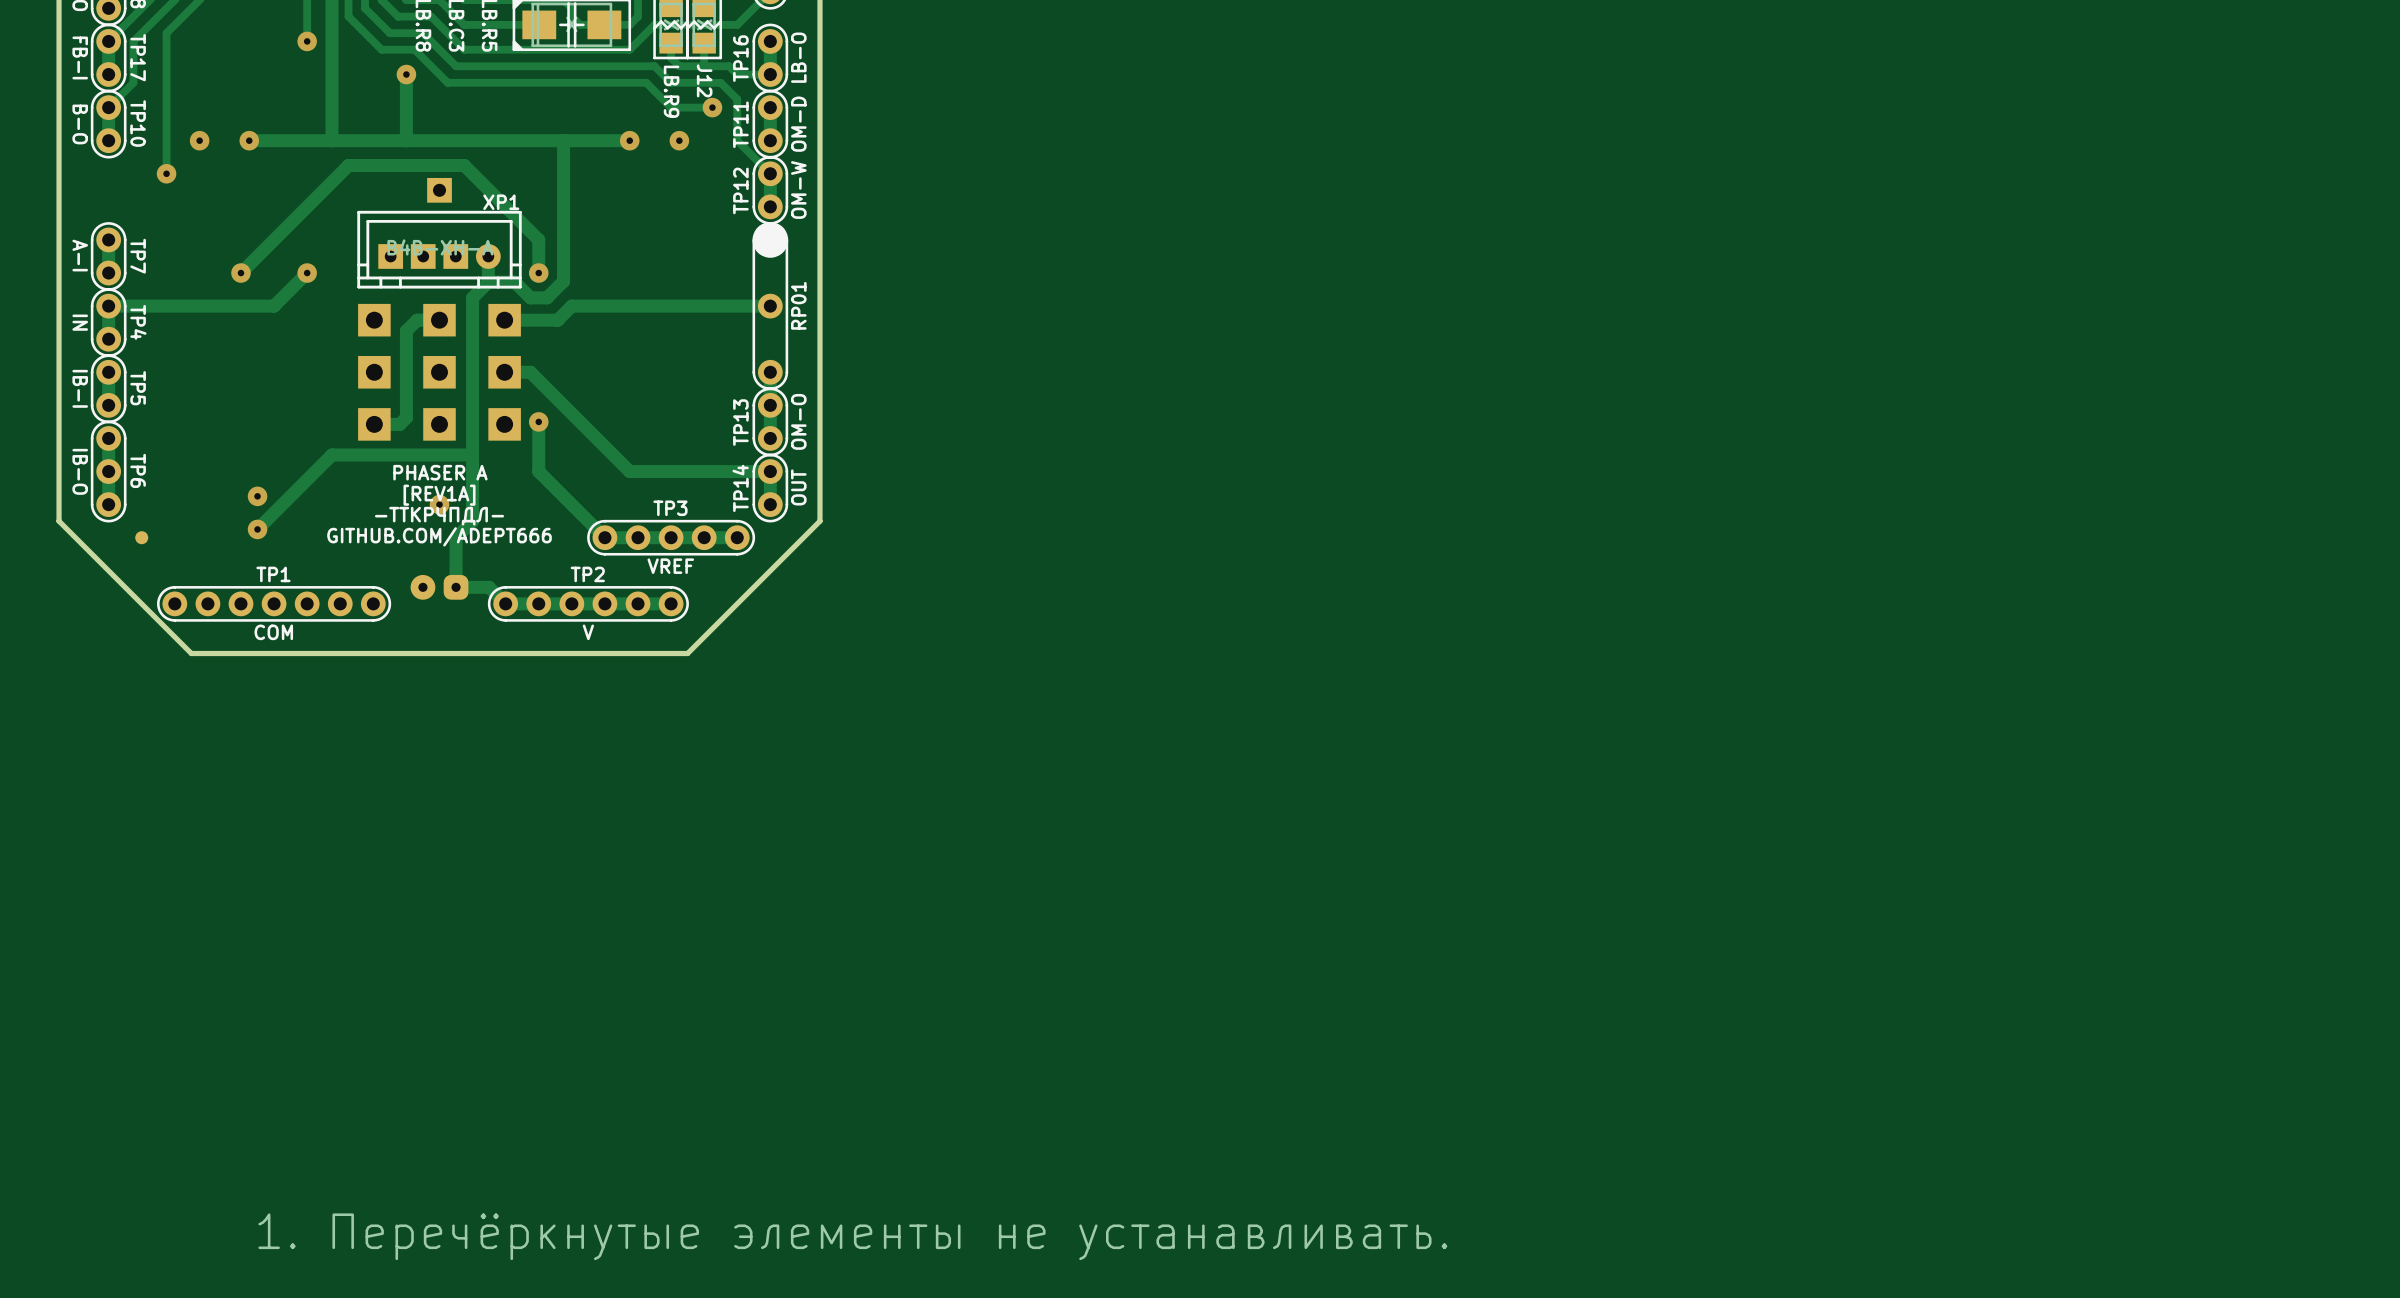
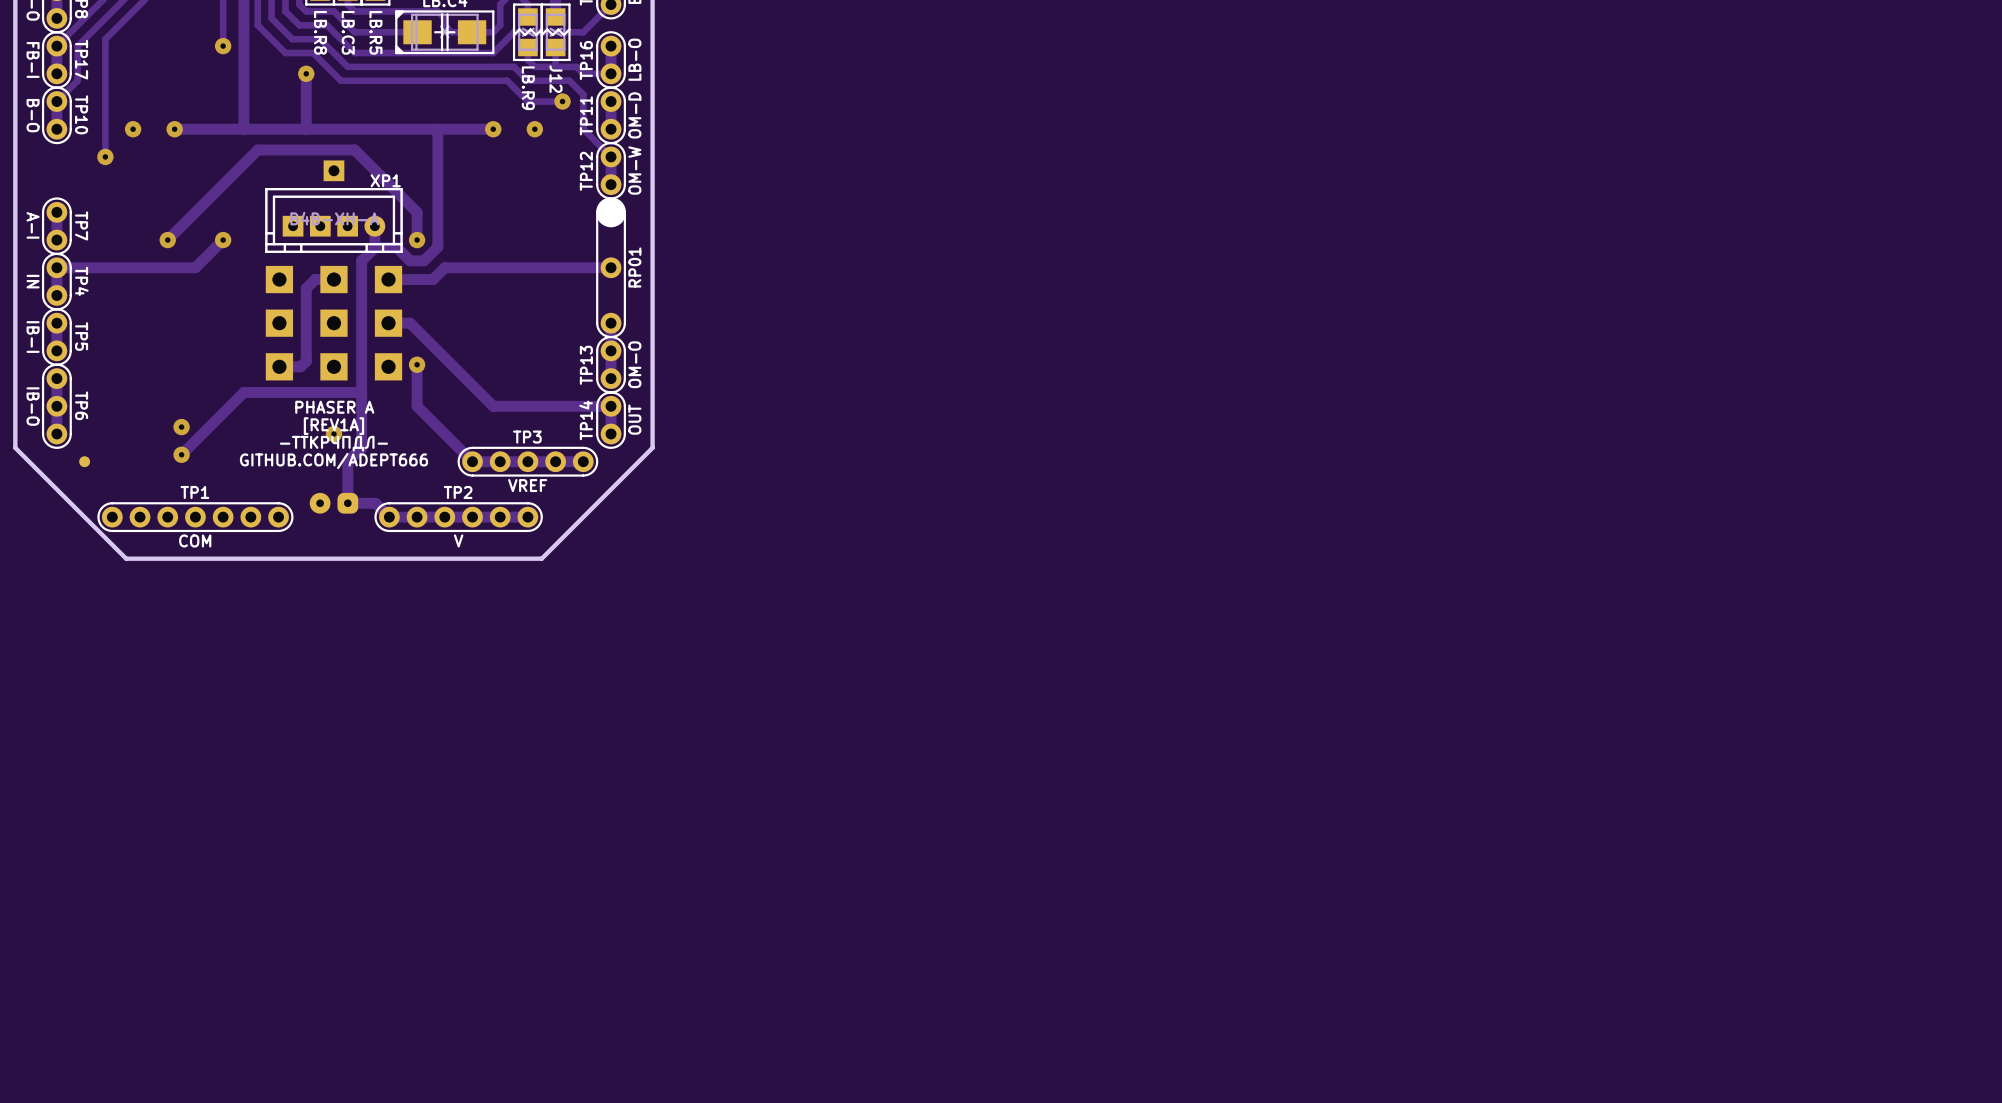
text: 1. Перечёркнутые элементы не устанавливать. (852, 1236) -> none

